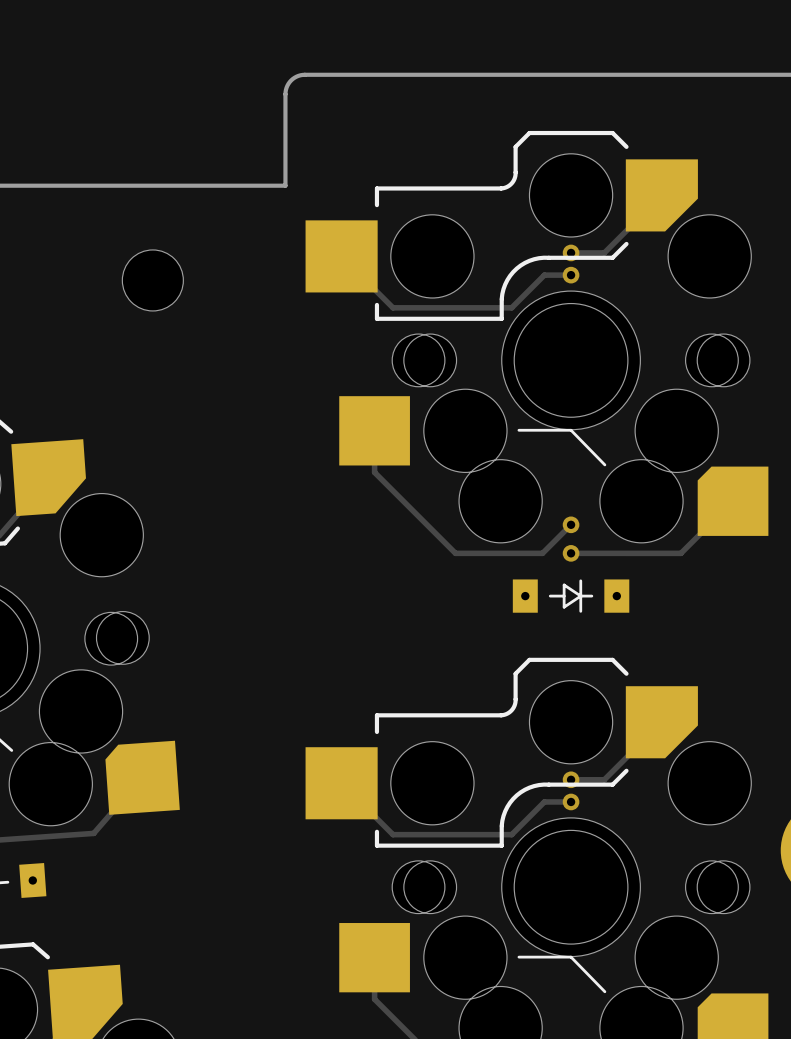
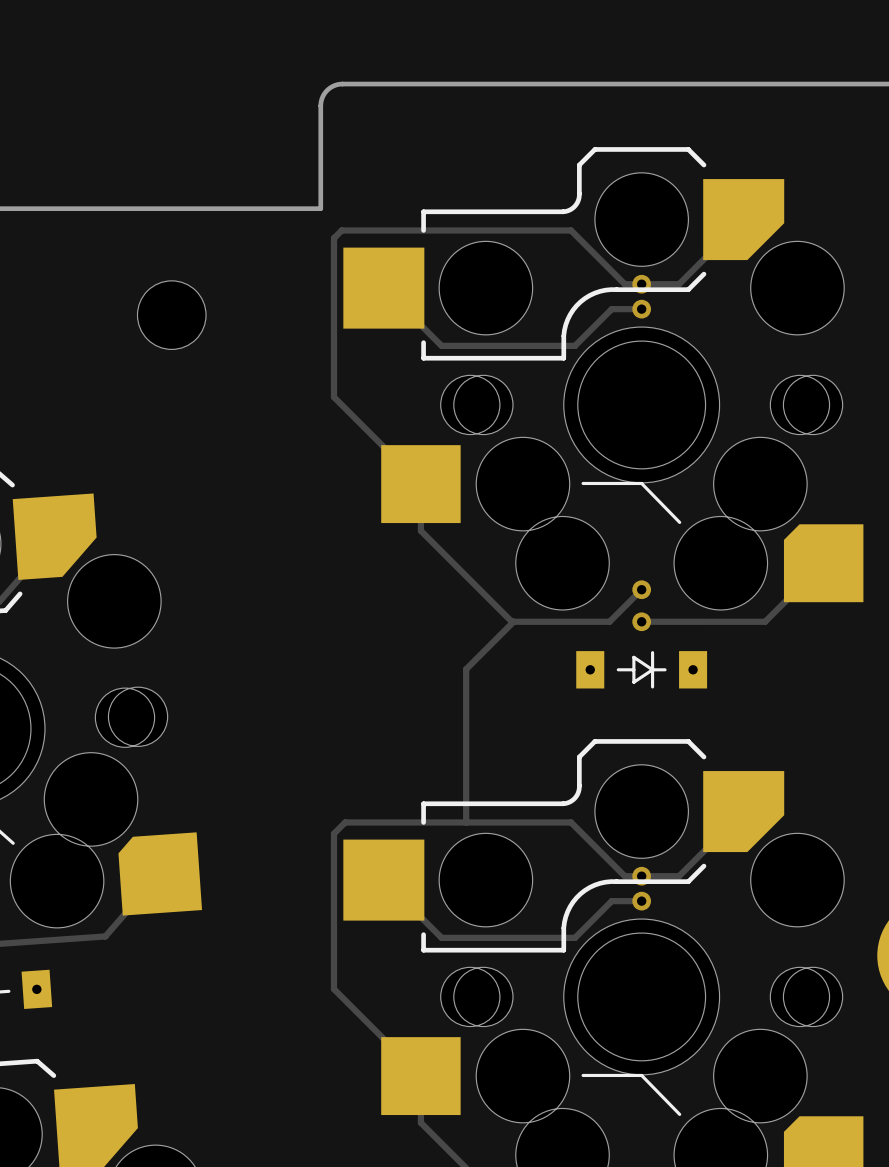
track: (661, 195) (604, 252) (571, 252) -> (743, 219) (679, 284) (624, 284) (571, 230) (341, 230) (333, 238) (333, 397) (420, 484)
track: none -> (513, 621) (466, 669) (466, 822)
track: (604, 779) (571, 779) -> (679, 876) (624, 876) (571, 822) (345, 822) (333, 833) (333, 989) (420, 1076)

